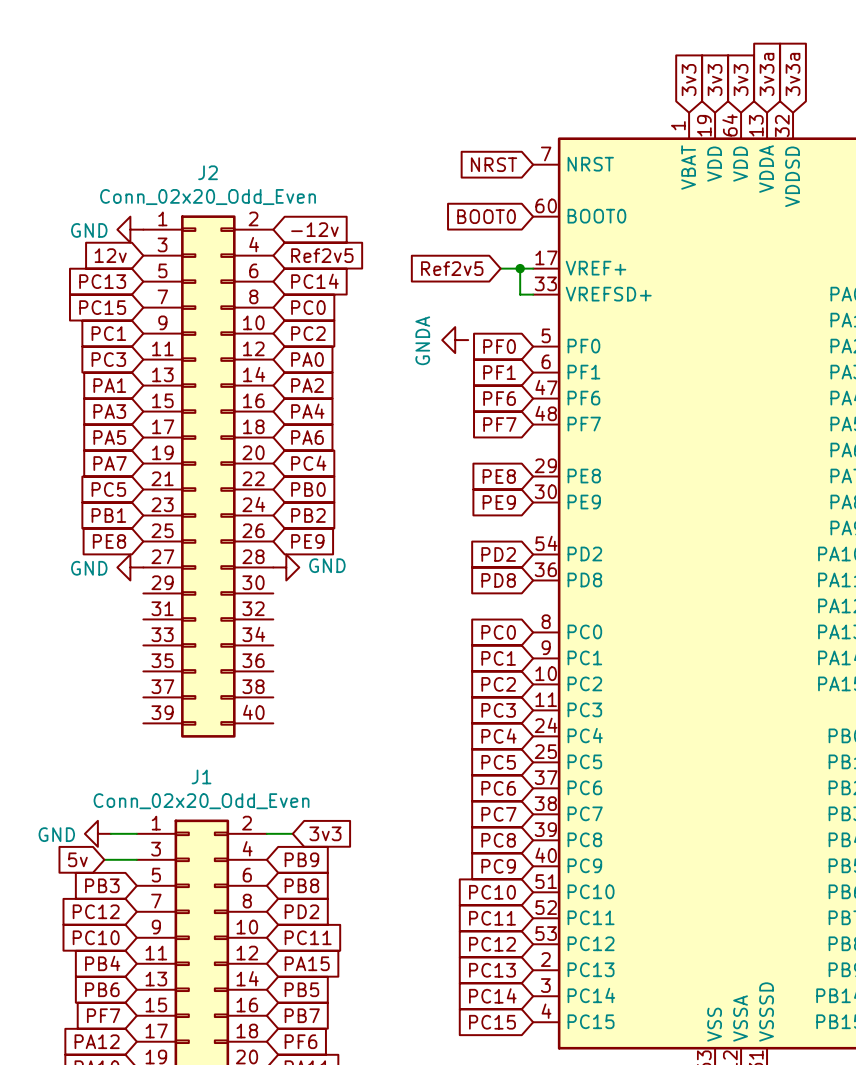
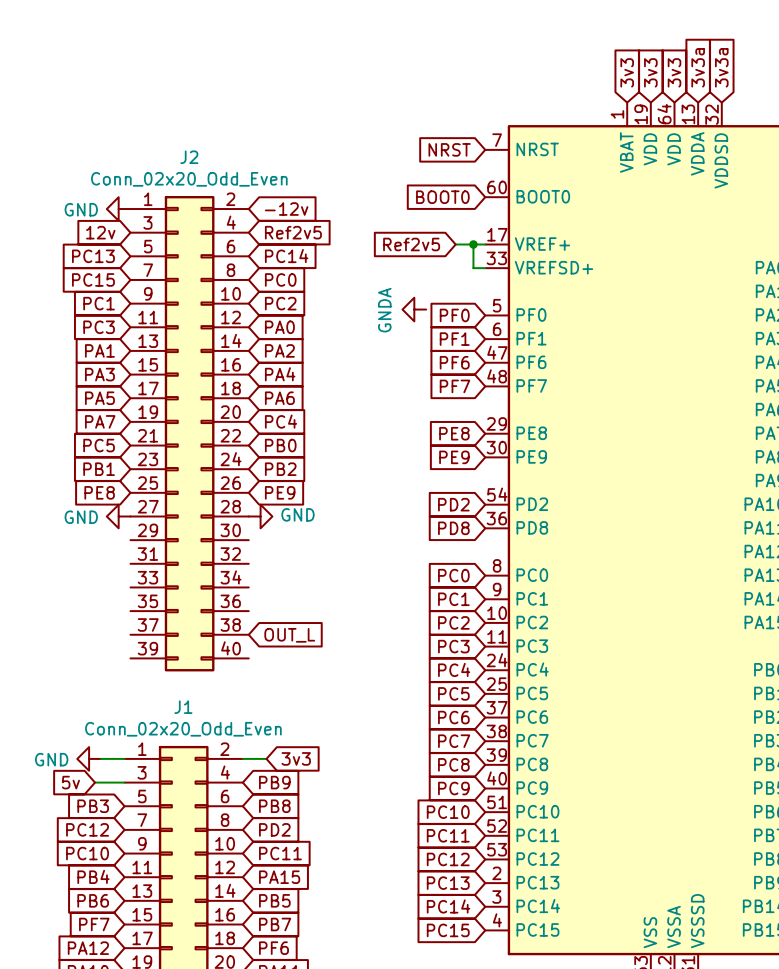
global label: none -> OUT_L (289, 635)

